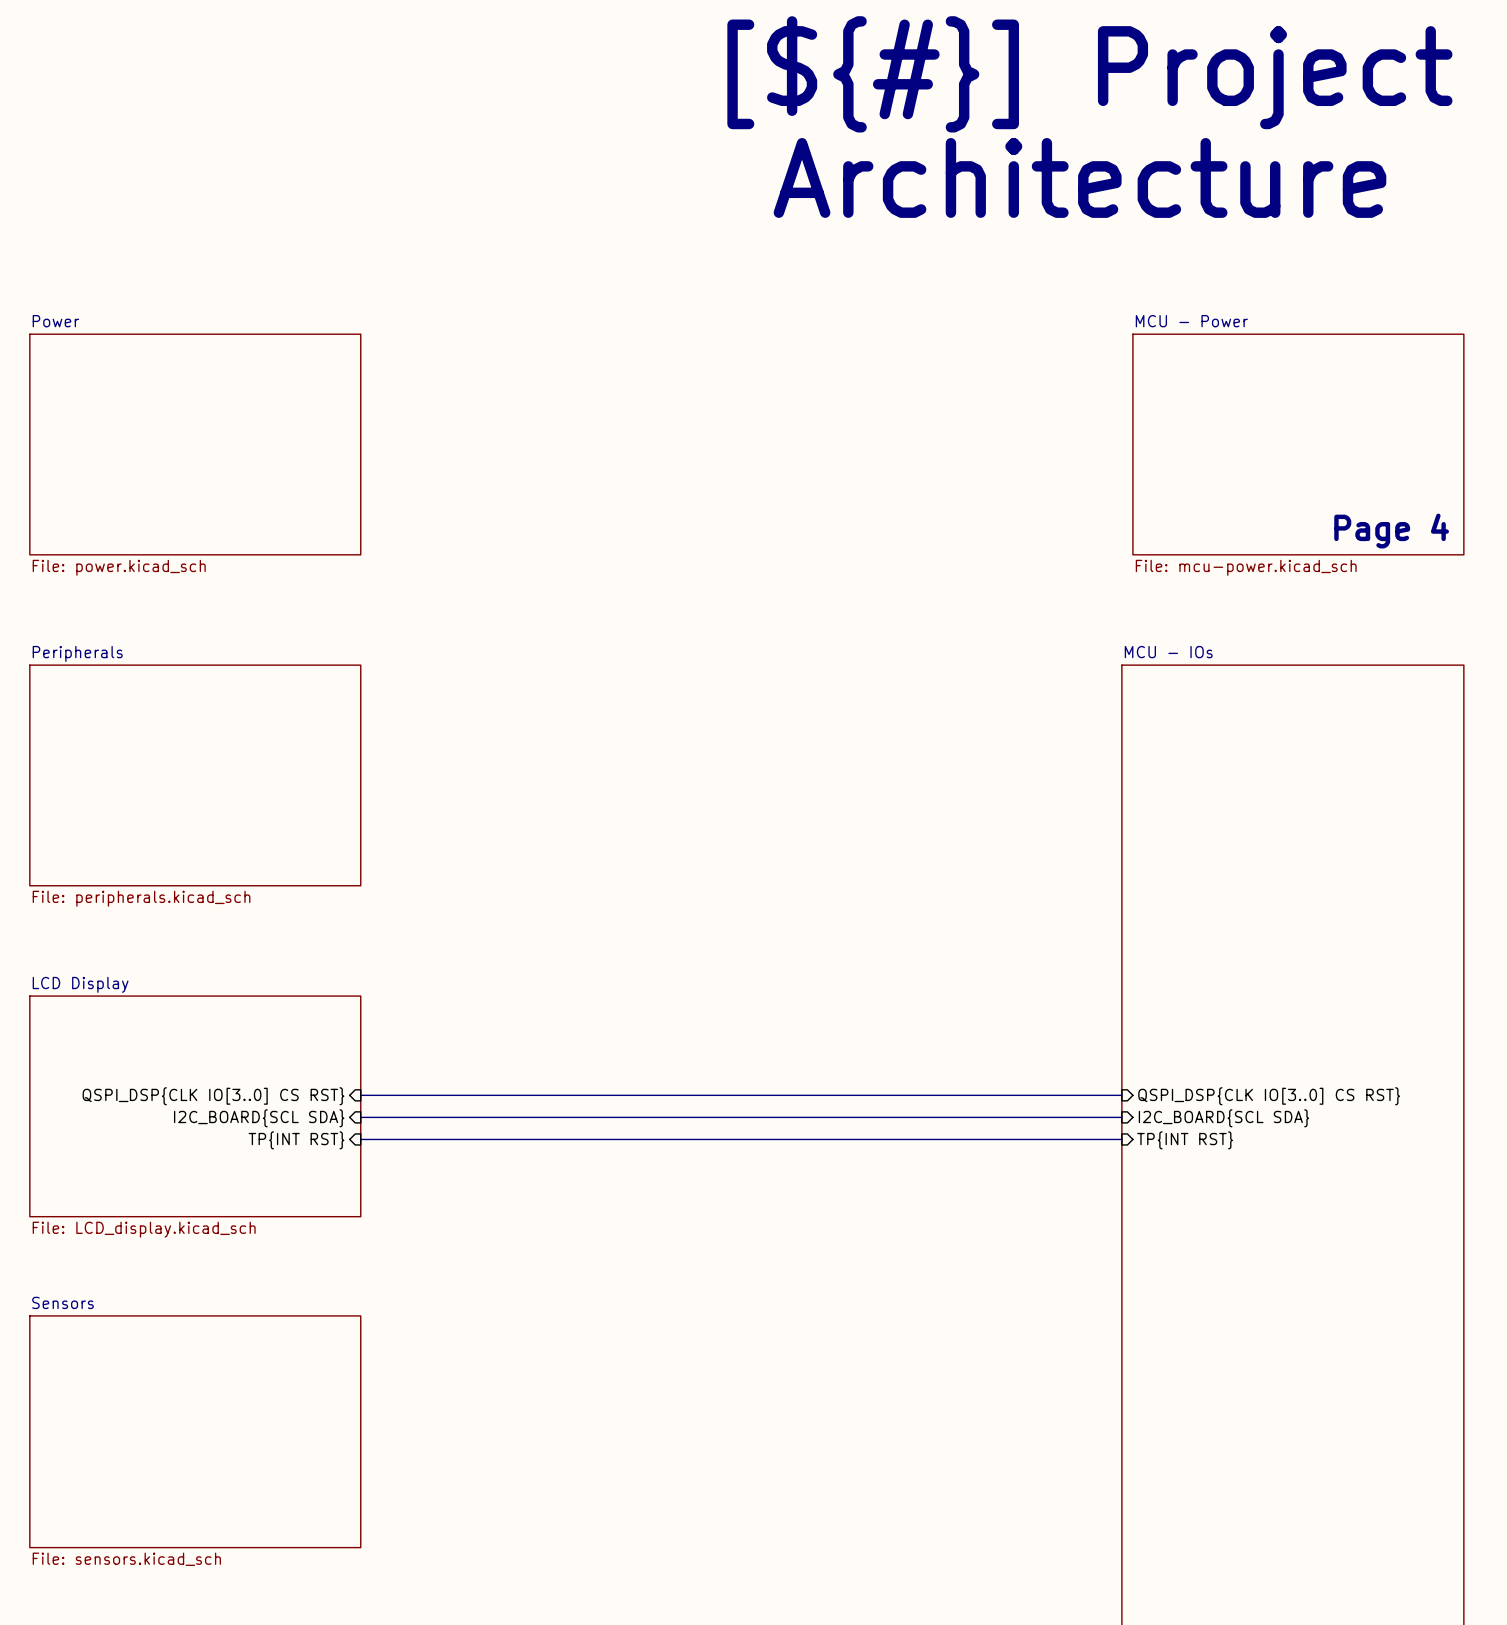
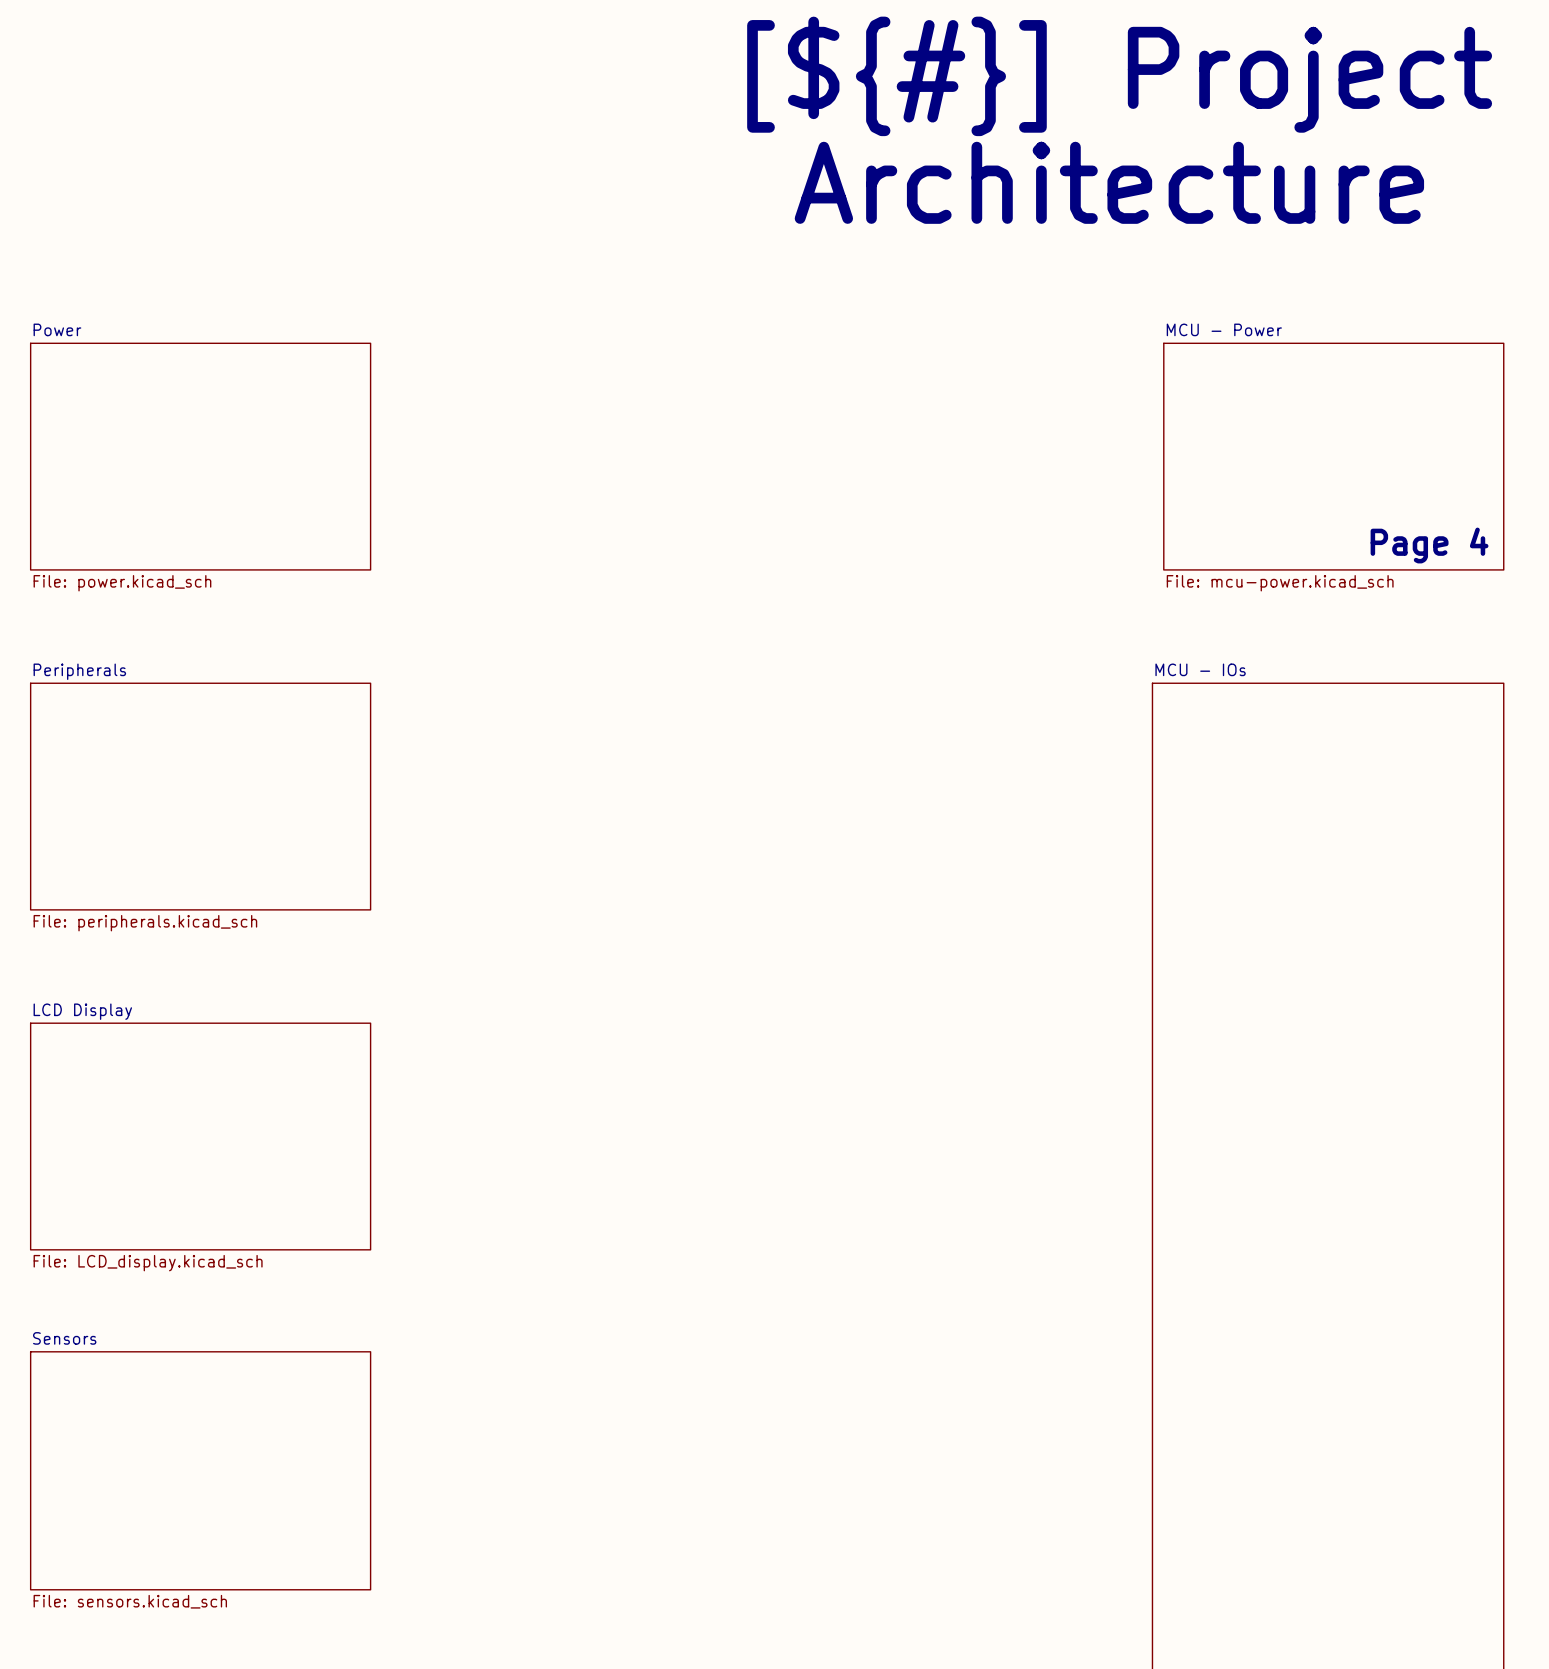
bus: (360, 1095) (1121, 1095) -> none
sheet pin: QSPI_DSP{CLK IO[3..0] CS RST} (213, 1096) -> none
sheet pin: QSPI_DSP{CLK IO[3..0] CS RST} (1269, 1096) -> none
bus: (360, 1117) (1121, 1117) -> none
sheet pin: I2C_BOARD{SCL SDA} (259, 1118) -> none
sheet pin: I2C_BOARD{SCL SDA} (1223, 1118) -> none
bus: (360, 1139) (1121, 1139) -> none
sheet pin: TP{INT RST} (296, 1140) -> none
sheet pin: TP{INT RST} (1185, 1140) -> none

